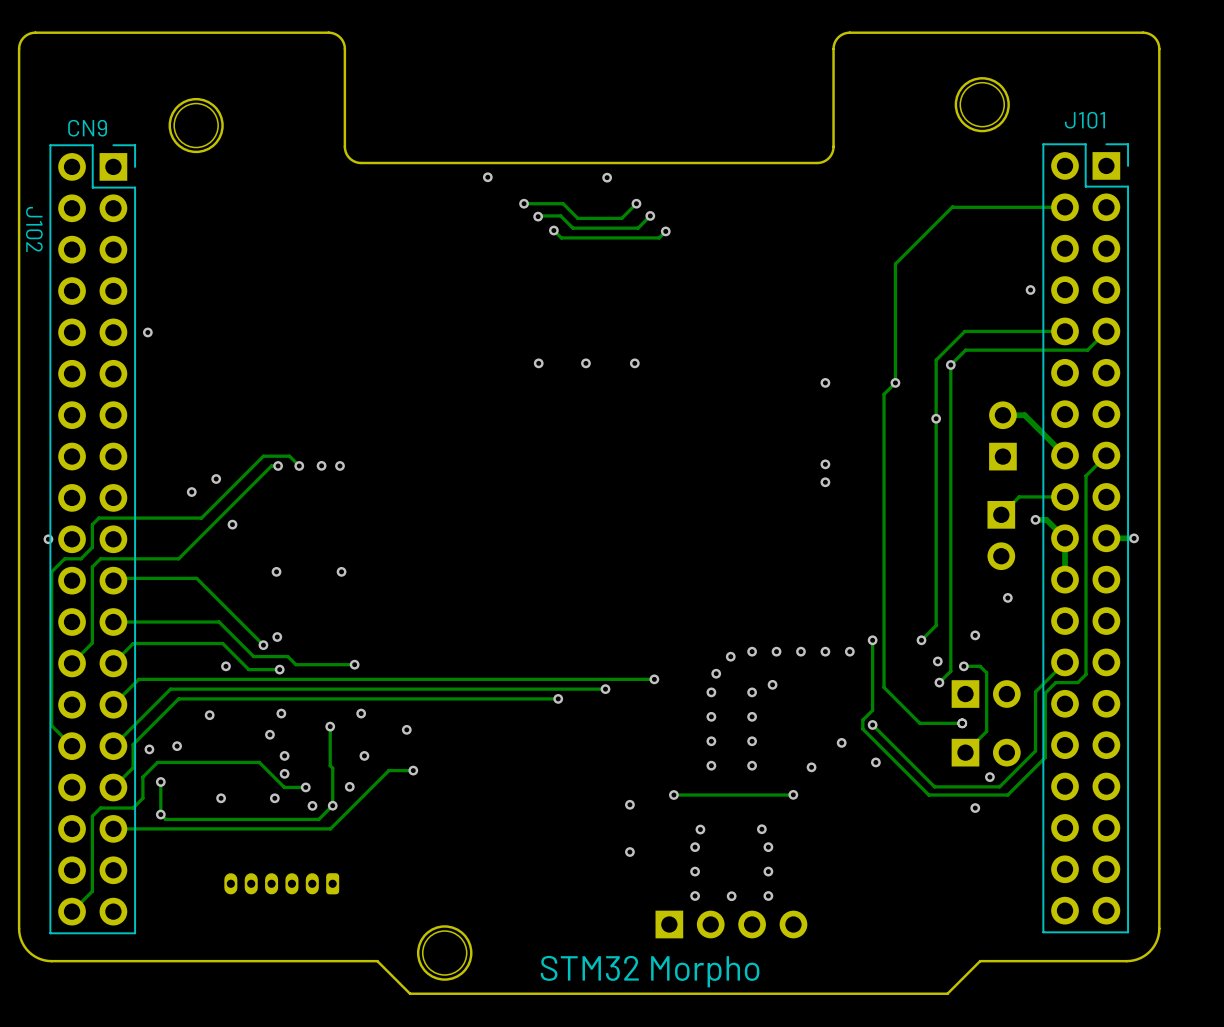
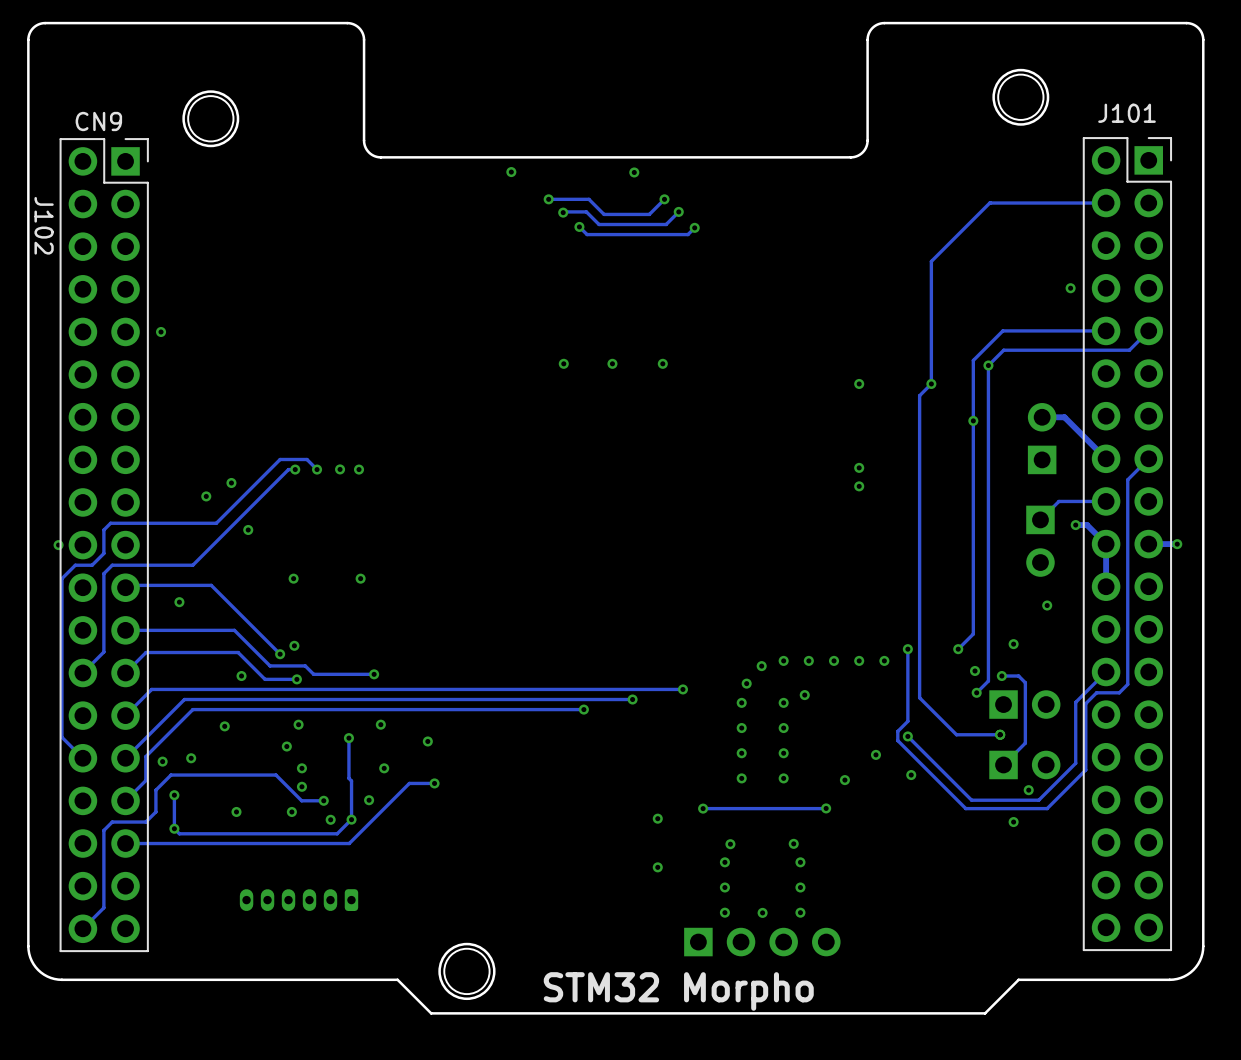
via: none -> (179, 602)

